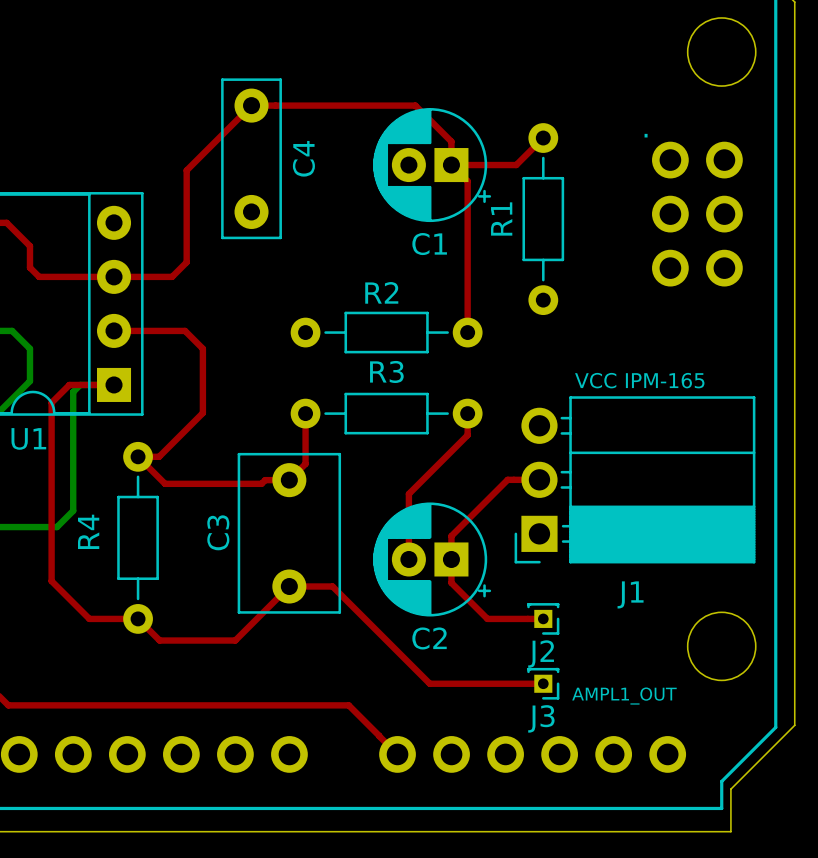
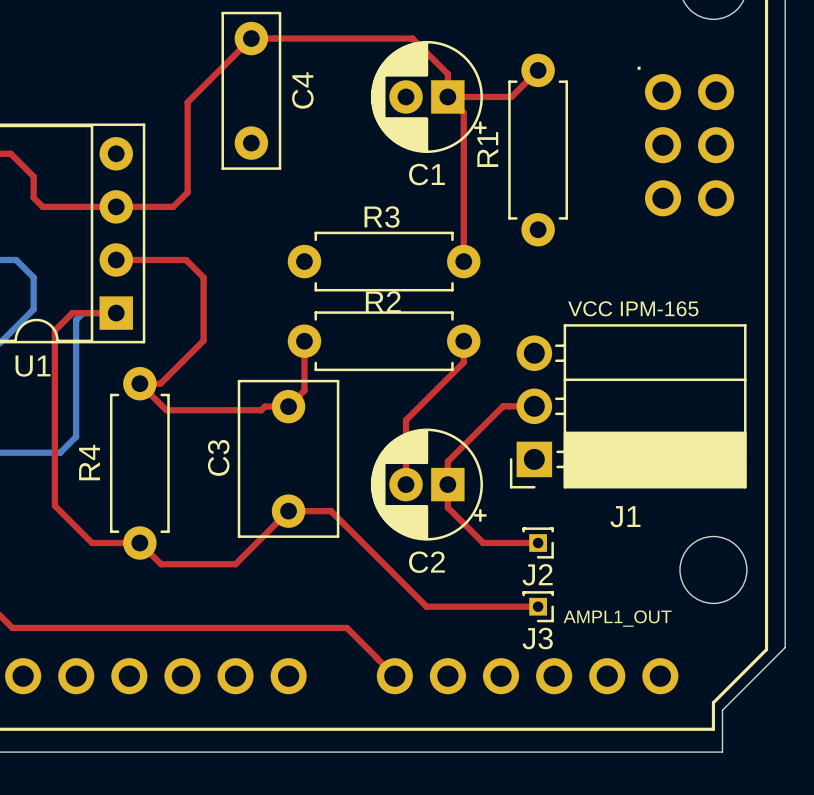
R1 footprint: [522, 123, 565, 316] -> [508, 53, 569, 247]
R2 name position: R2 (381, 292) -> R2 (383, 301)
R2 footprint: [290, 311, 483, 354] -> [287, 231, 481, 292]
R3 name position: R3 (386, 371) -> R3 (382, 216)
R3 footprint: [290, 392, 483, 435] -> [287, 311, 481, 372]
R4 footprint: [117, 441, 159, 634] -> [109, 366, 170, 560]

